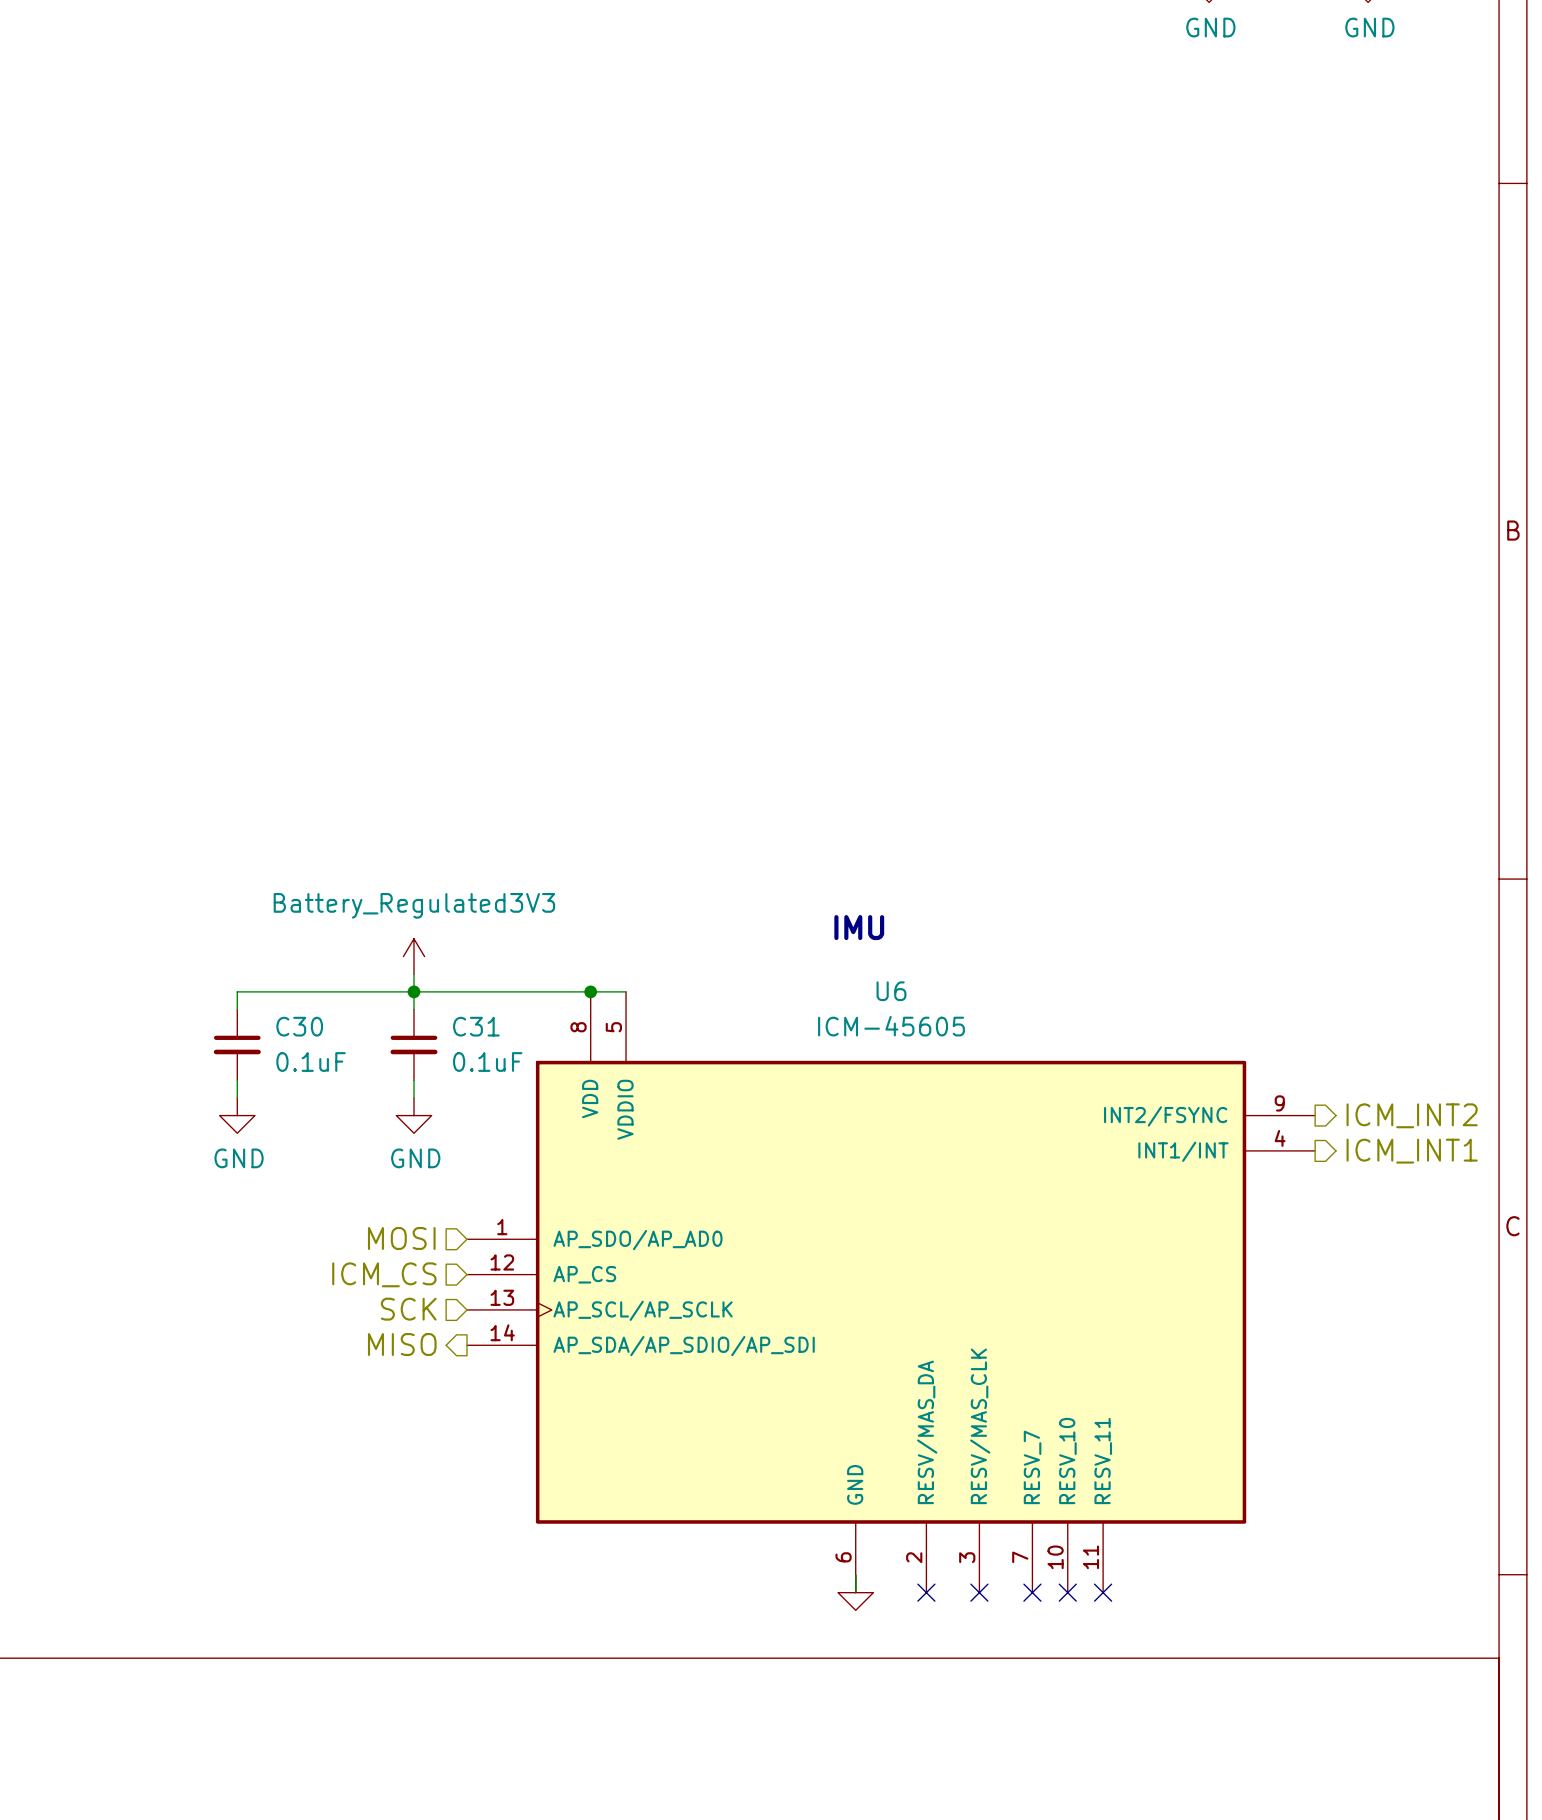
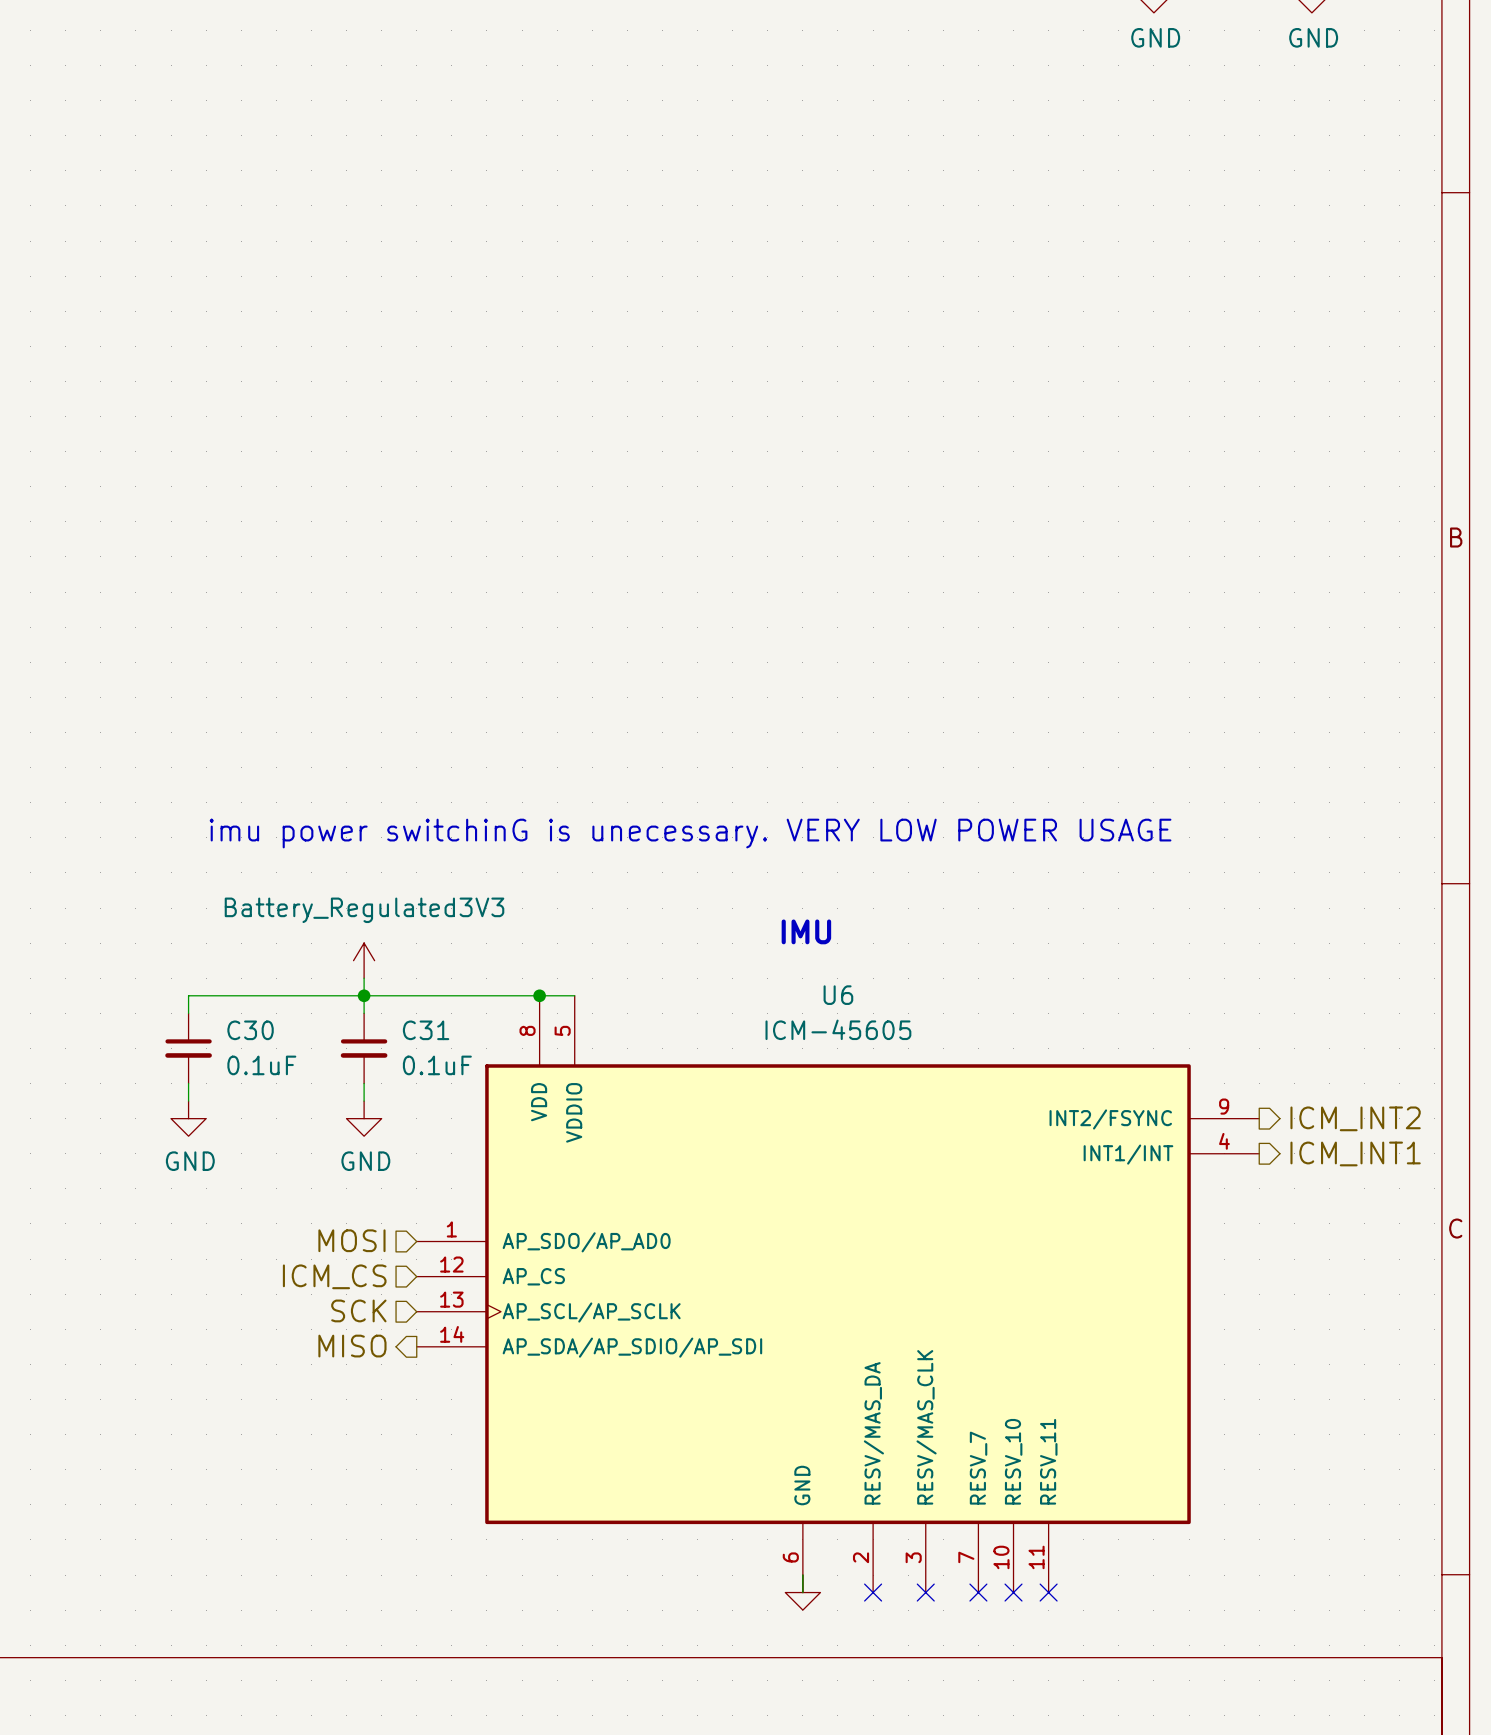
text: none -> imu power switchinG is unecessary. VERY LOW POWER USAGE (690, 833)

